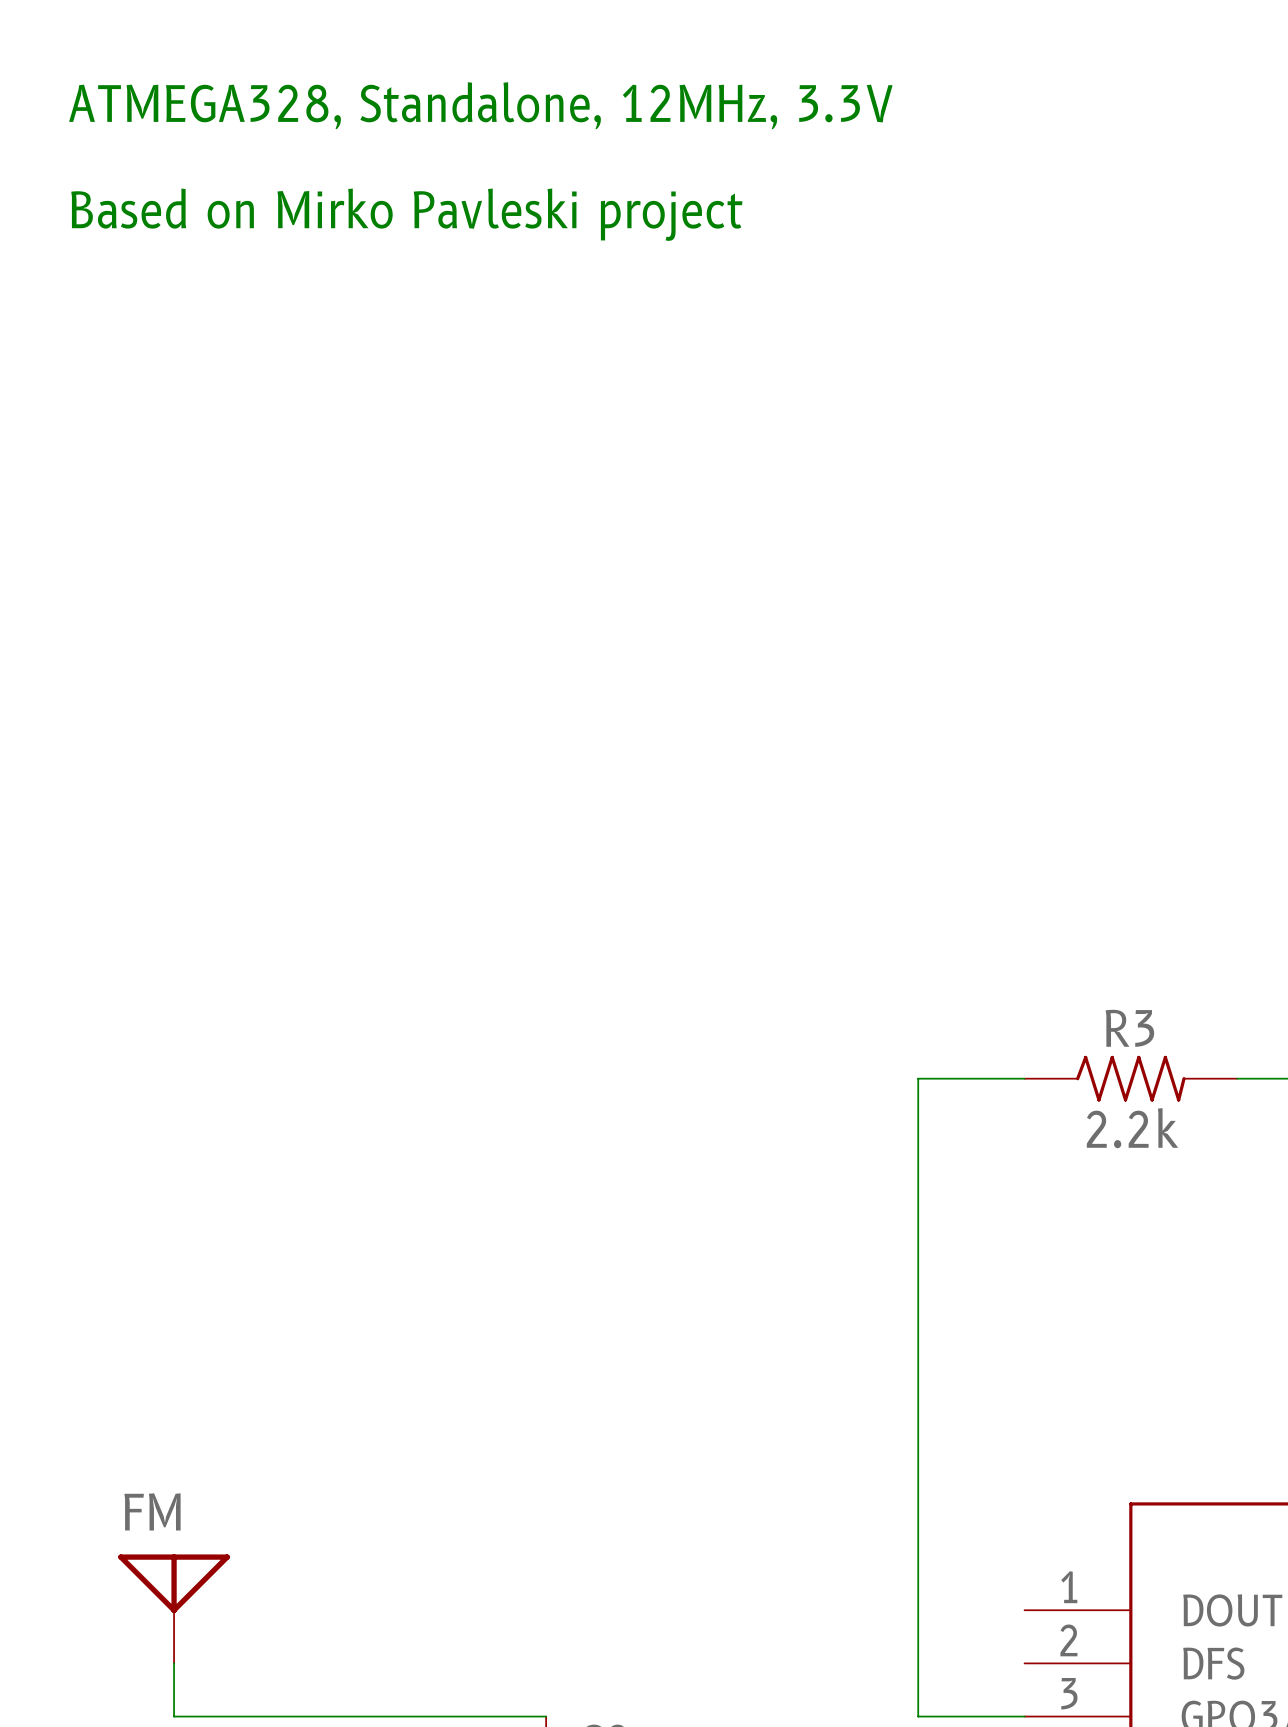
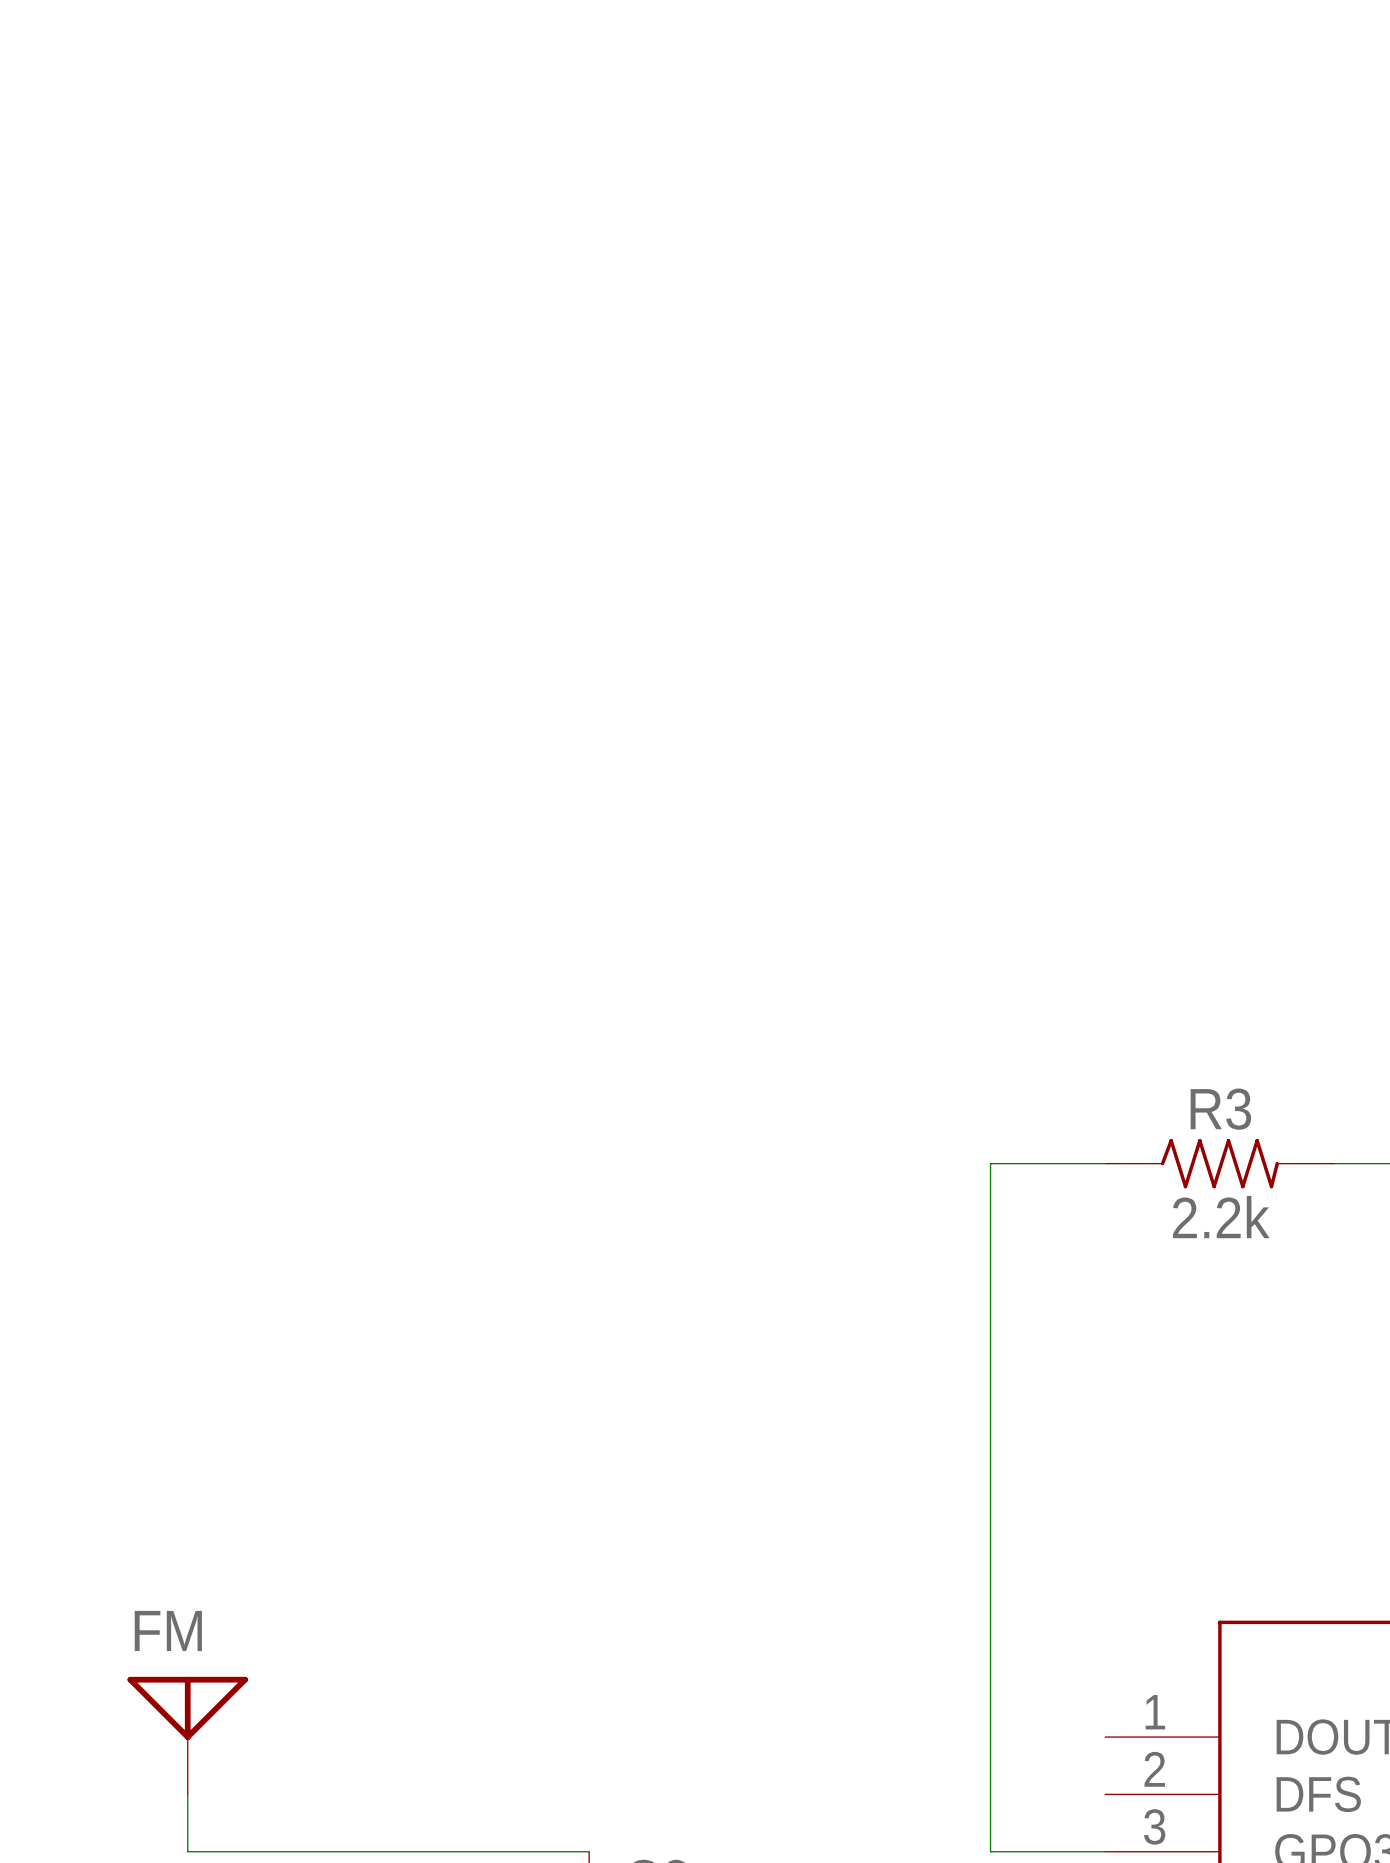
text: ATMEGA328, Standalone, 12MHz, 3.3V (480, 105) -> none
text: Based on Mirko Pavleski project (406, 214) -> none

